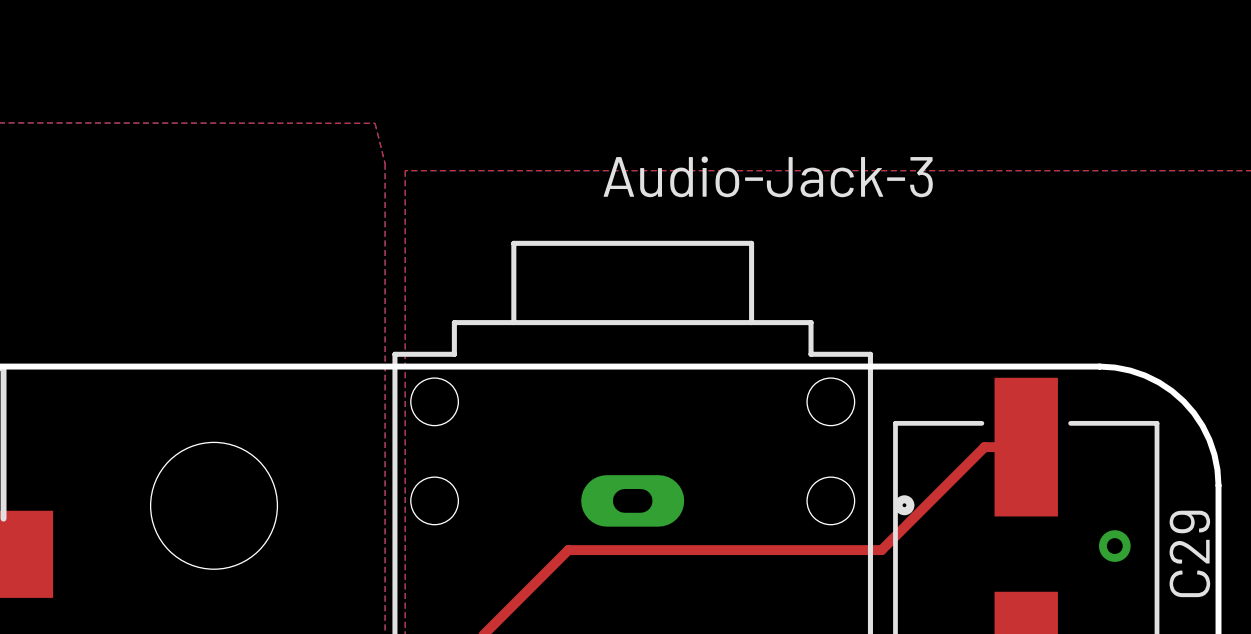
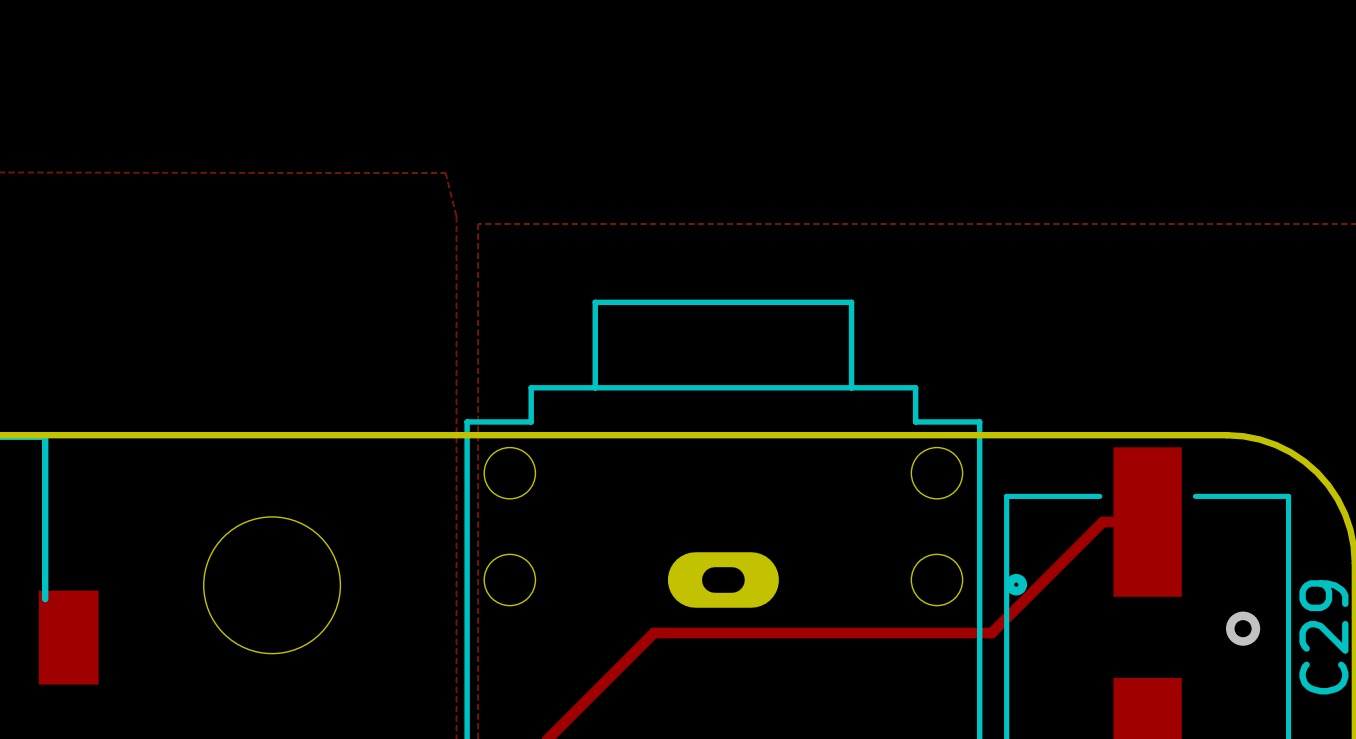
part value: Audio-Jack-3 (768, 176) -> none

